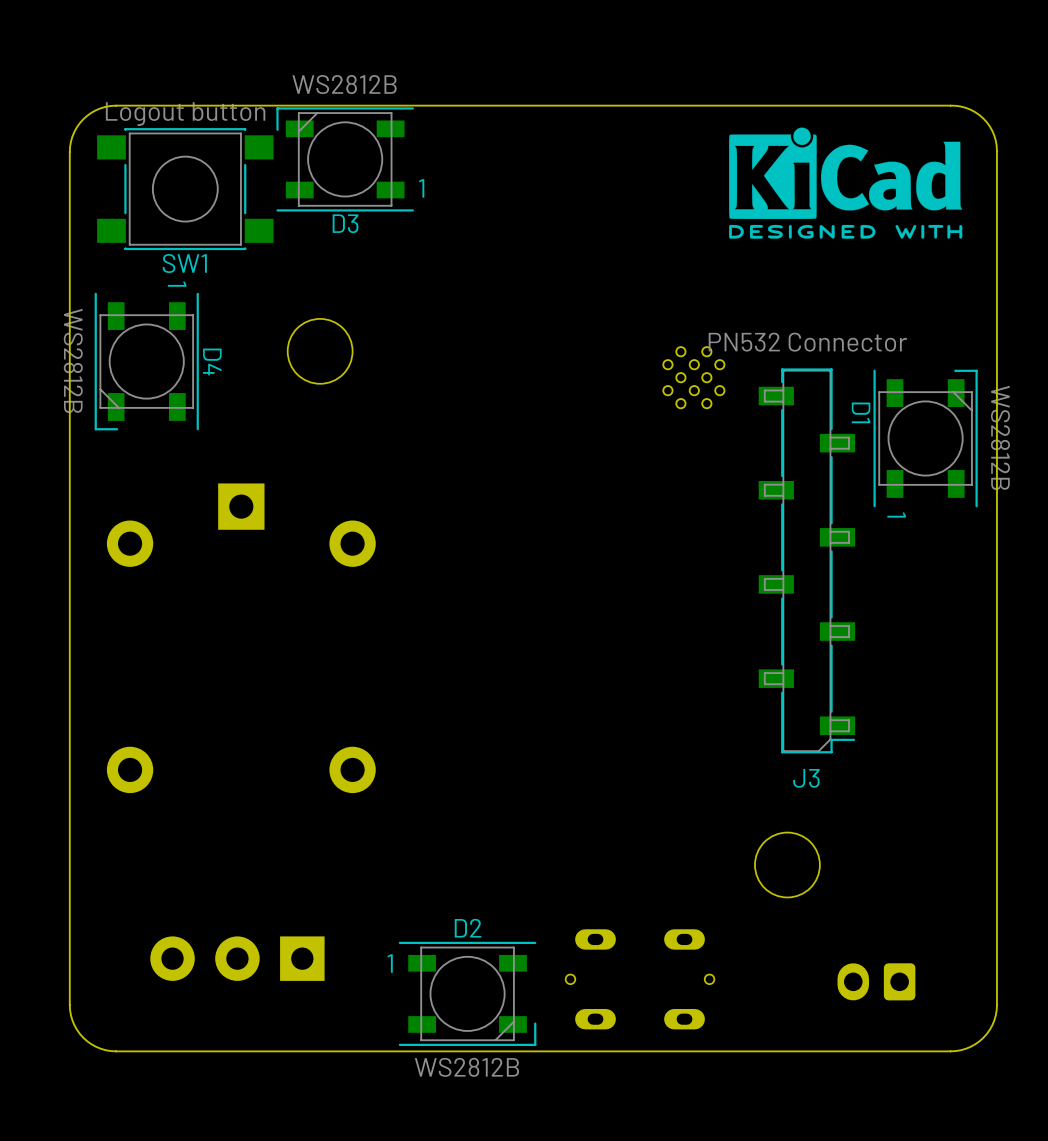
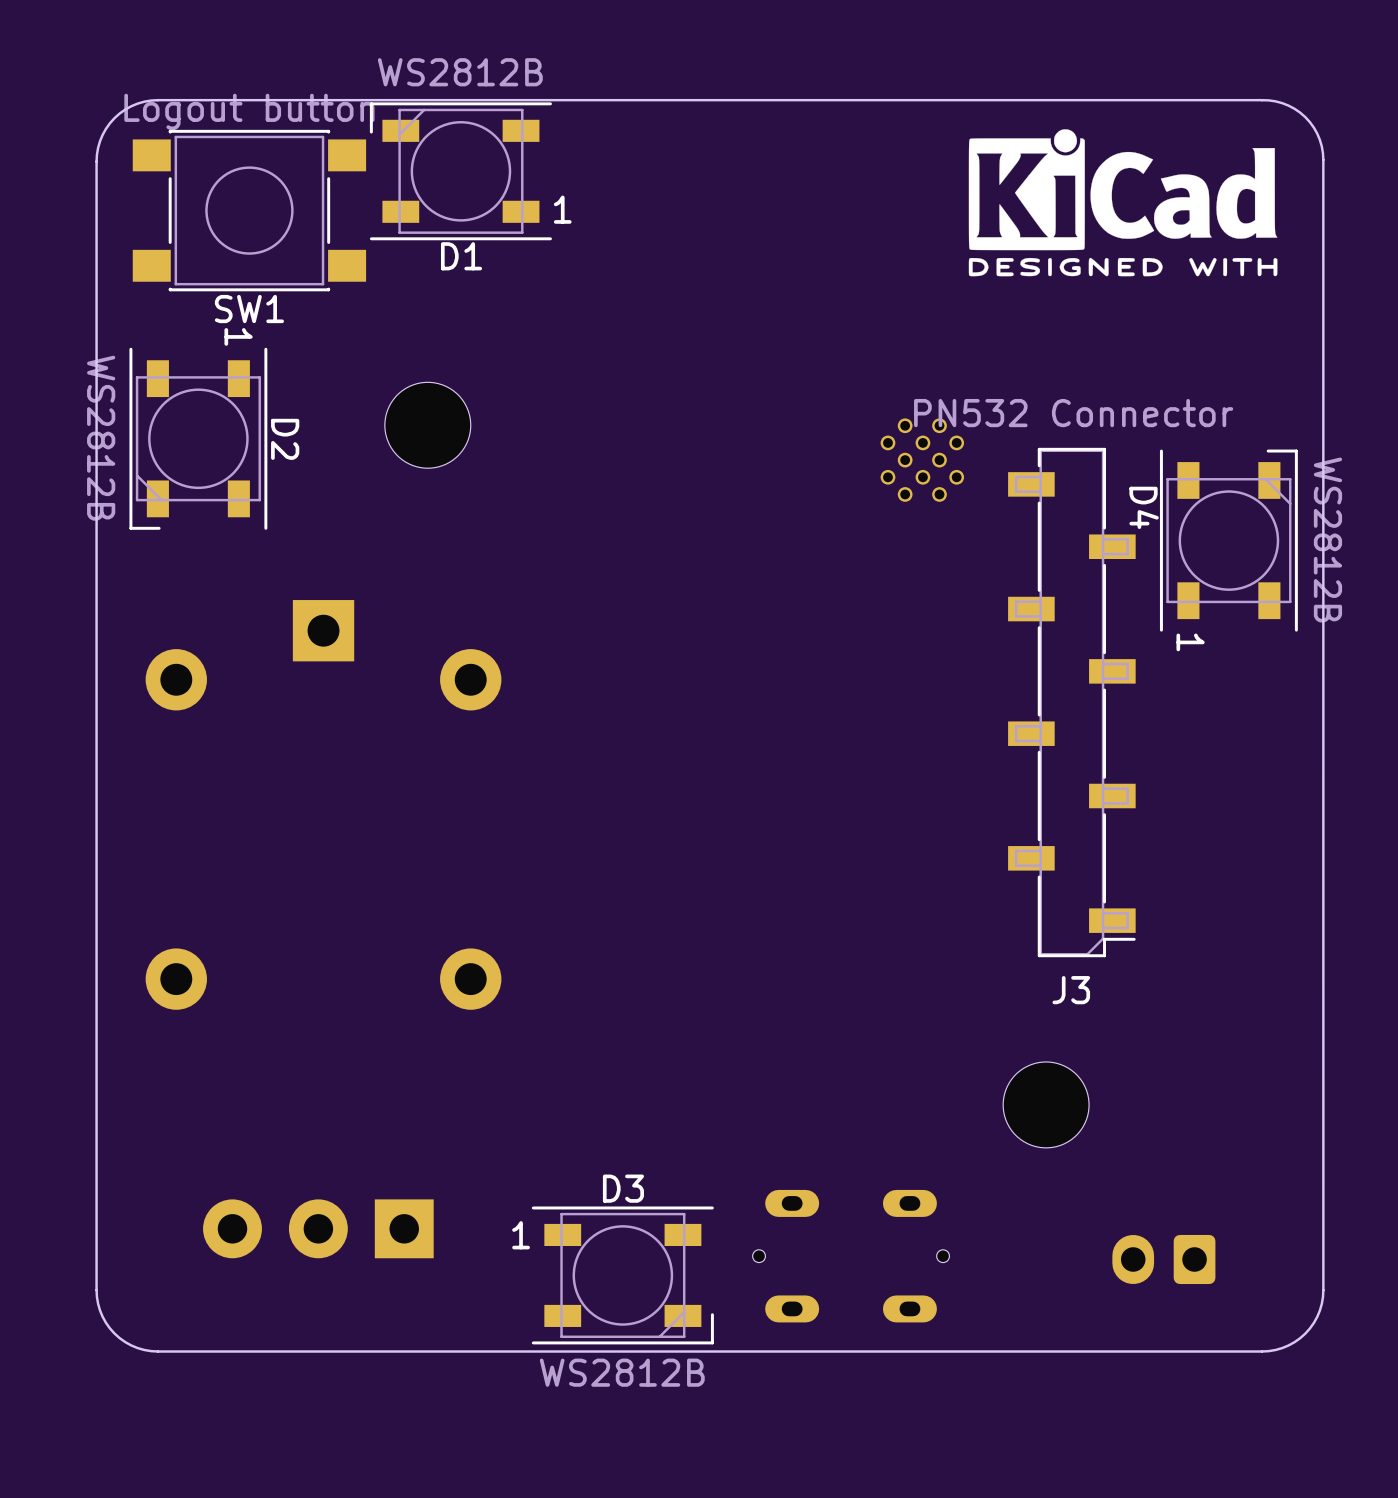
D3 name: D3 (345, 223) -> D1 (461, 256)
D4 name: D4 (212, 361) -> D2 (285, 439)
D1 name: D1 (861, 412) -> D4 (1144, 507)
D2 name: D2 (468, 928) -> D3 (623, 1188)

